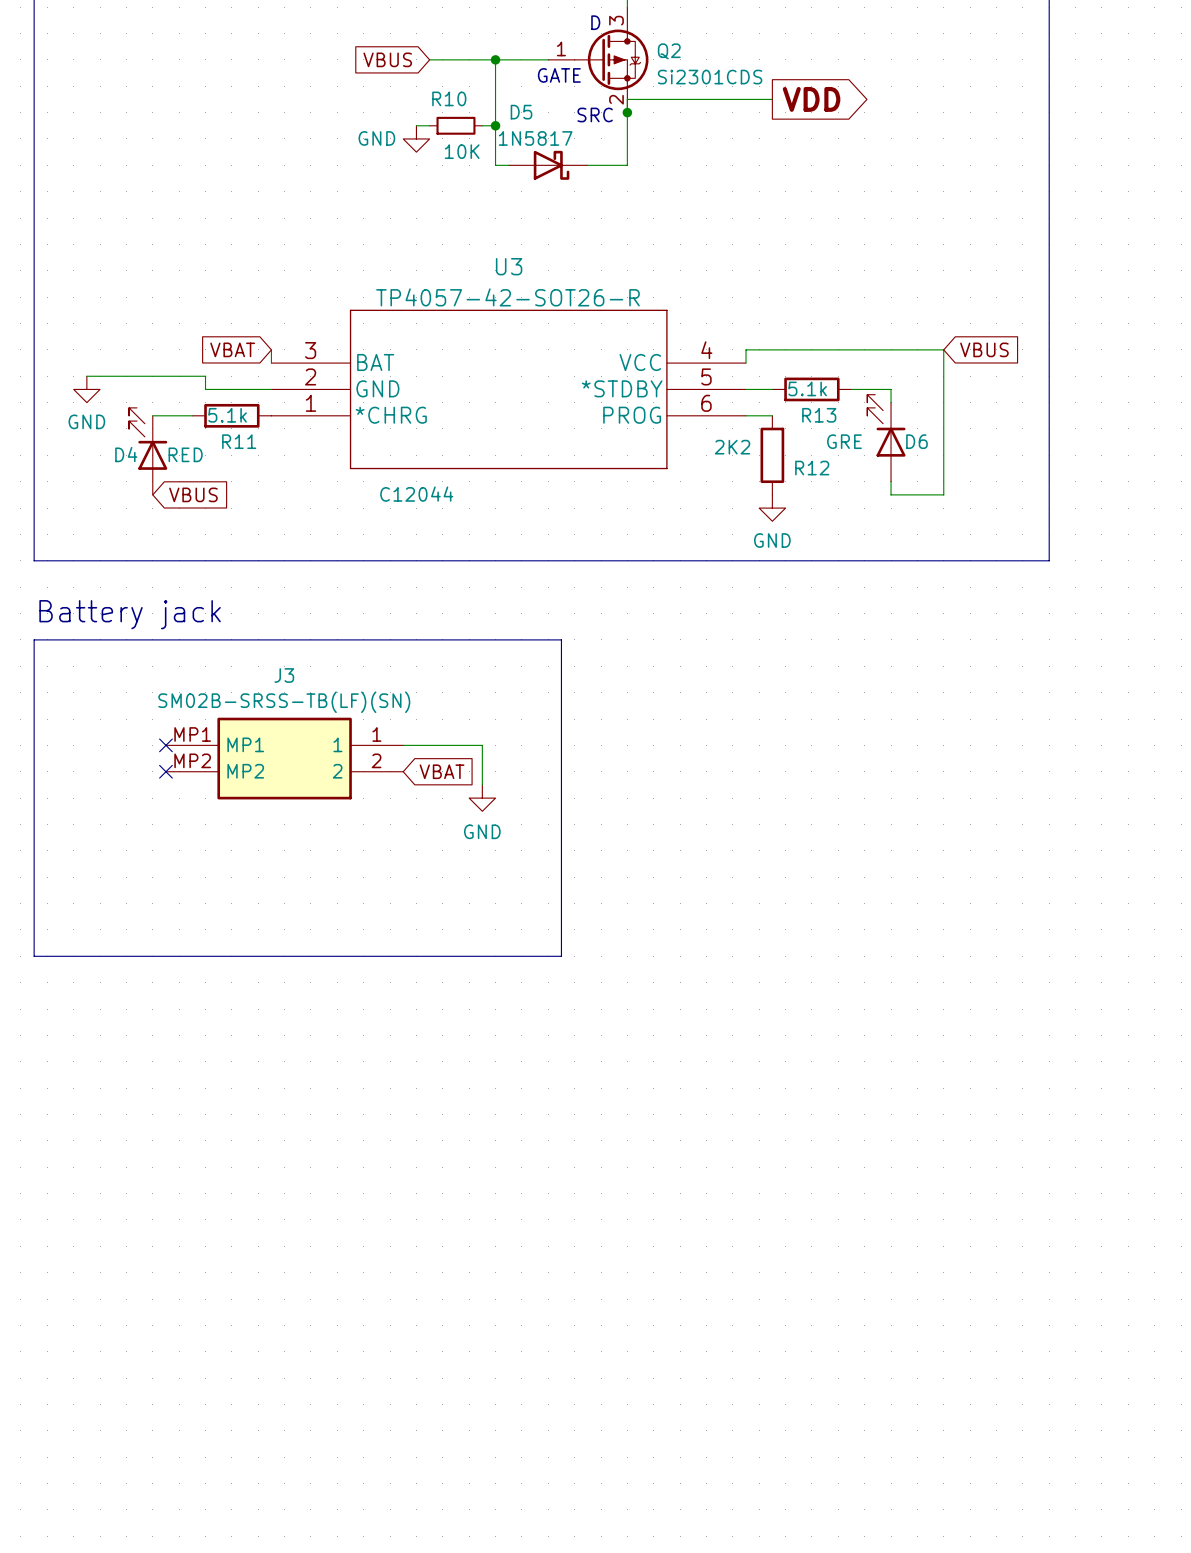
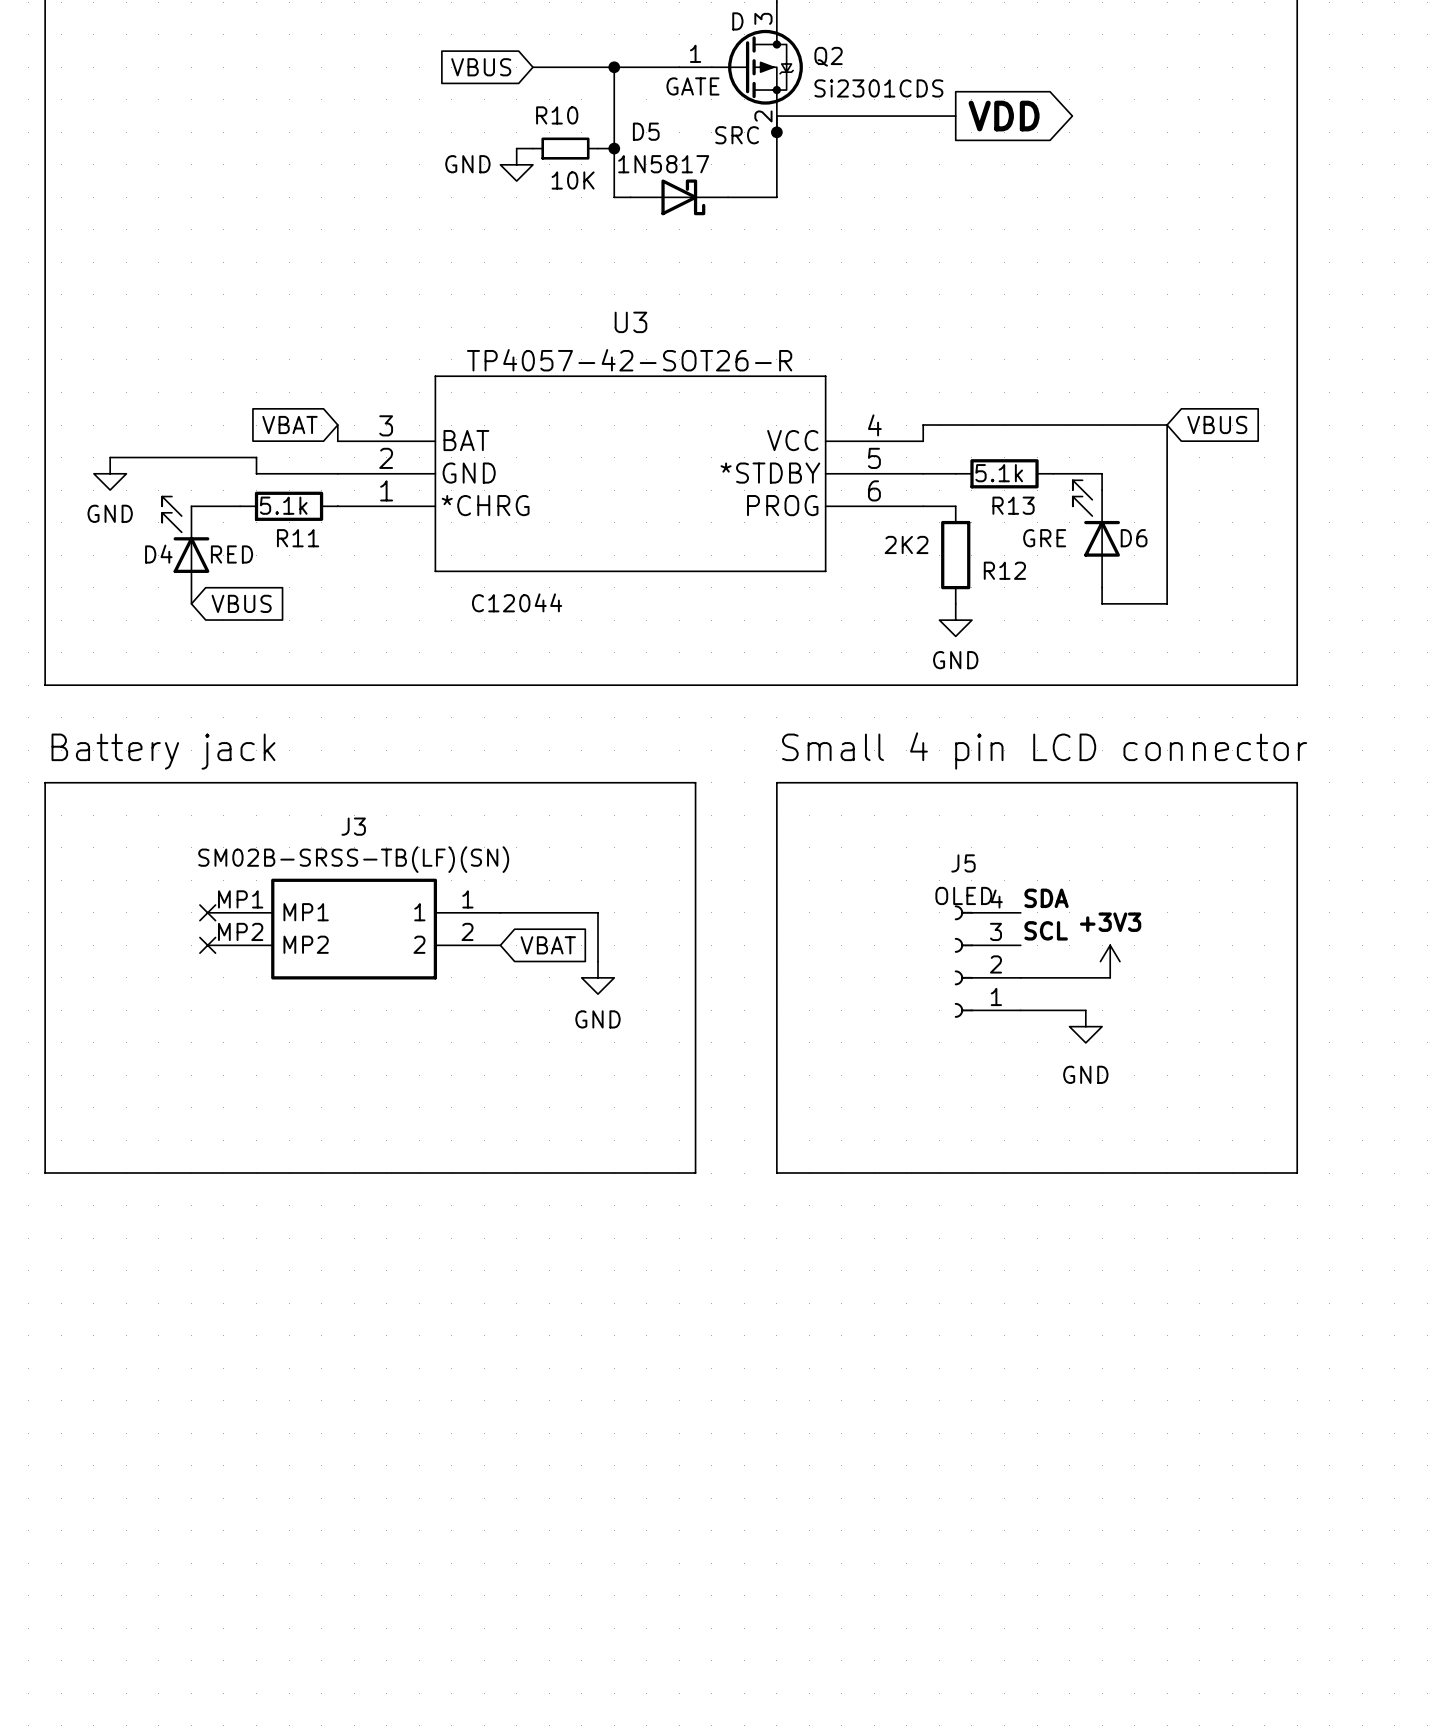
text: none -> Small 4 pin LCD connector (1044, 751)
line: none -> (776, 782) (1297, 782) (1297, 1173) (776, 1173) (776, 782)
label: none -> SDA (1046, 898)
label: none -> SCL (1046, 930)
J5: none -> OLED (987, 961)
power symbol: none -> +3V3 (1110, 961)
wire: none -> (1020, 977) (1110, 977)
wire: none -> (1020, 1010) (1085, 1010)
power symbol: none -> GND (1085, 1026)

